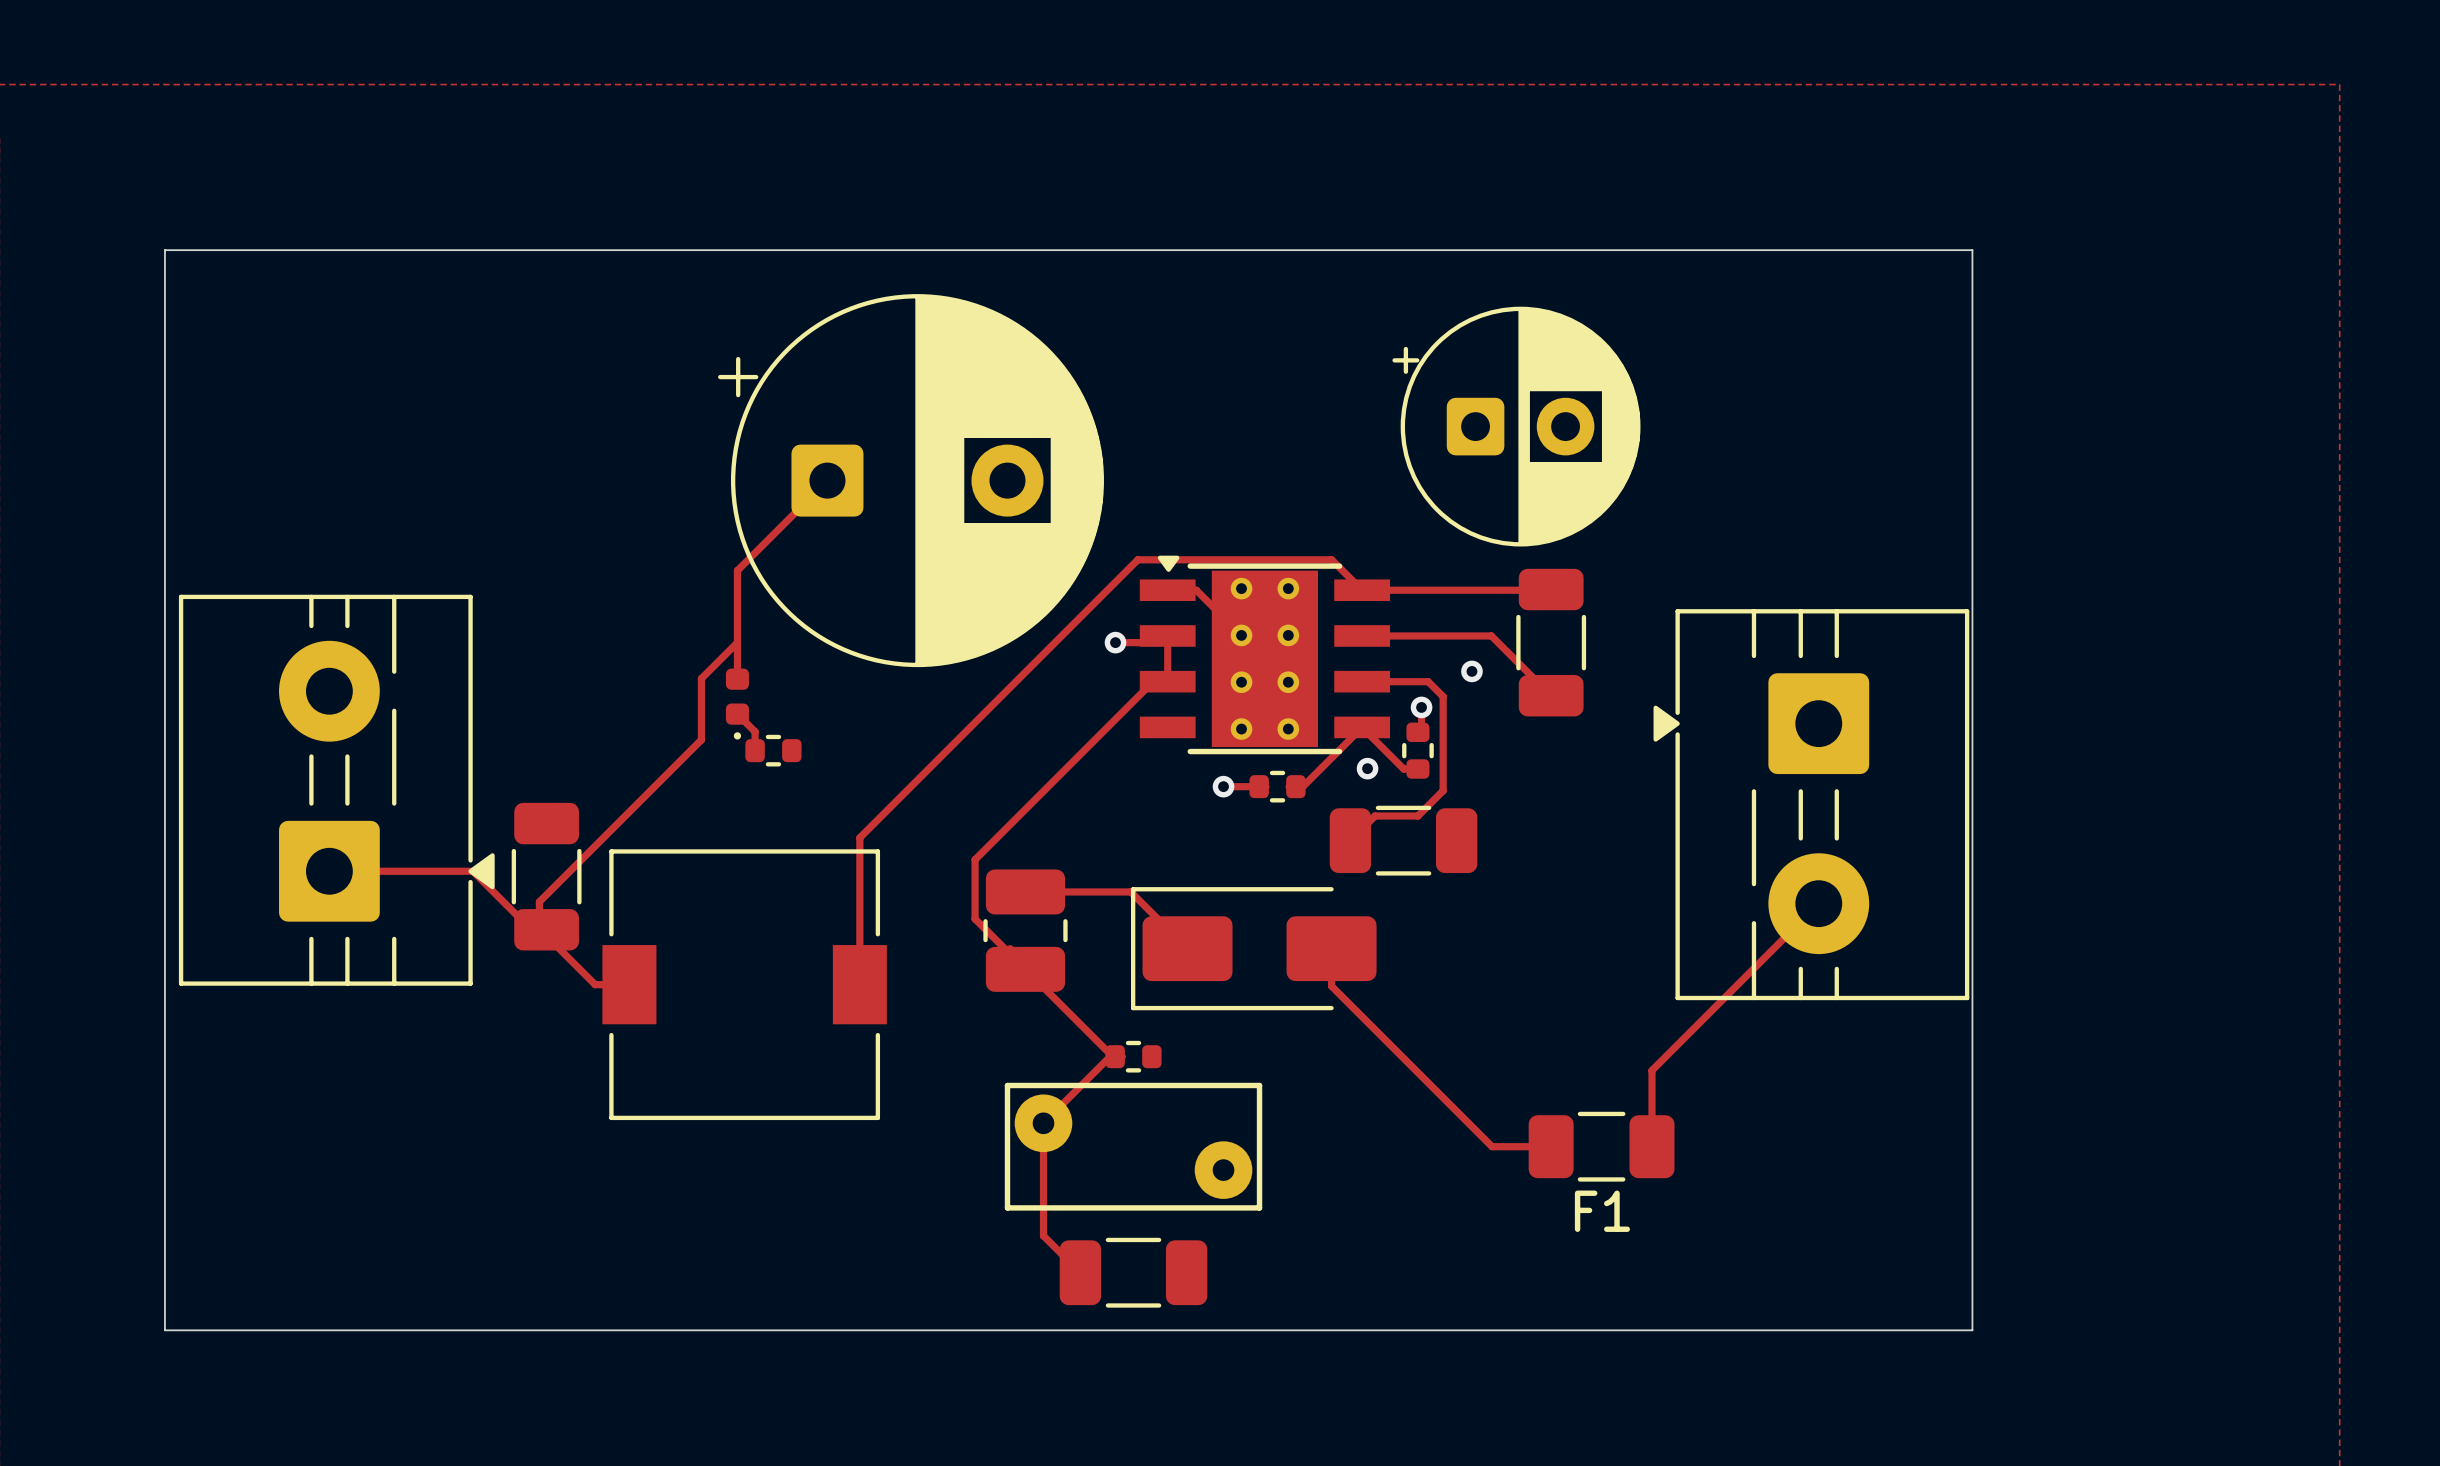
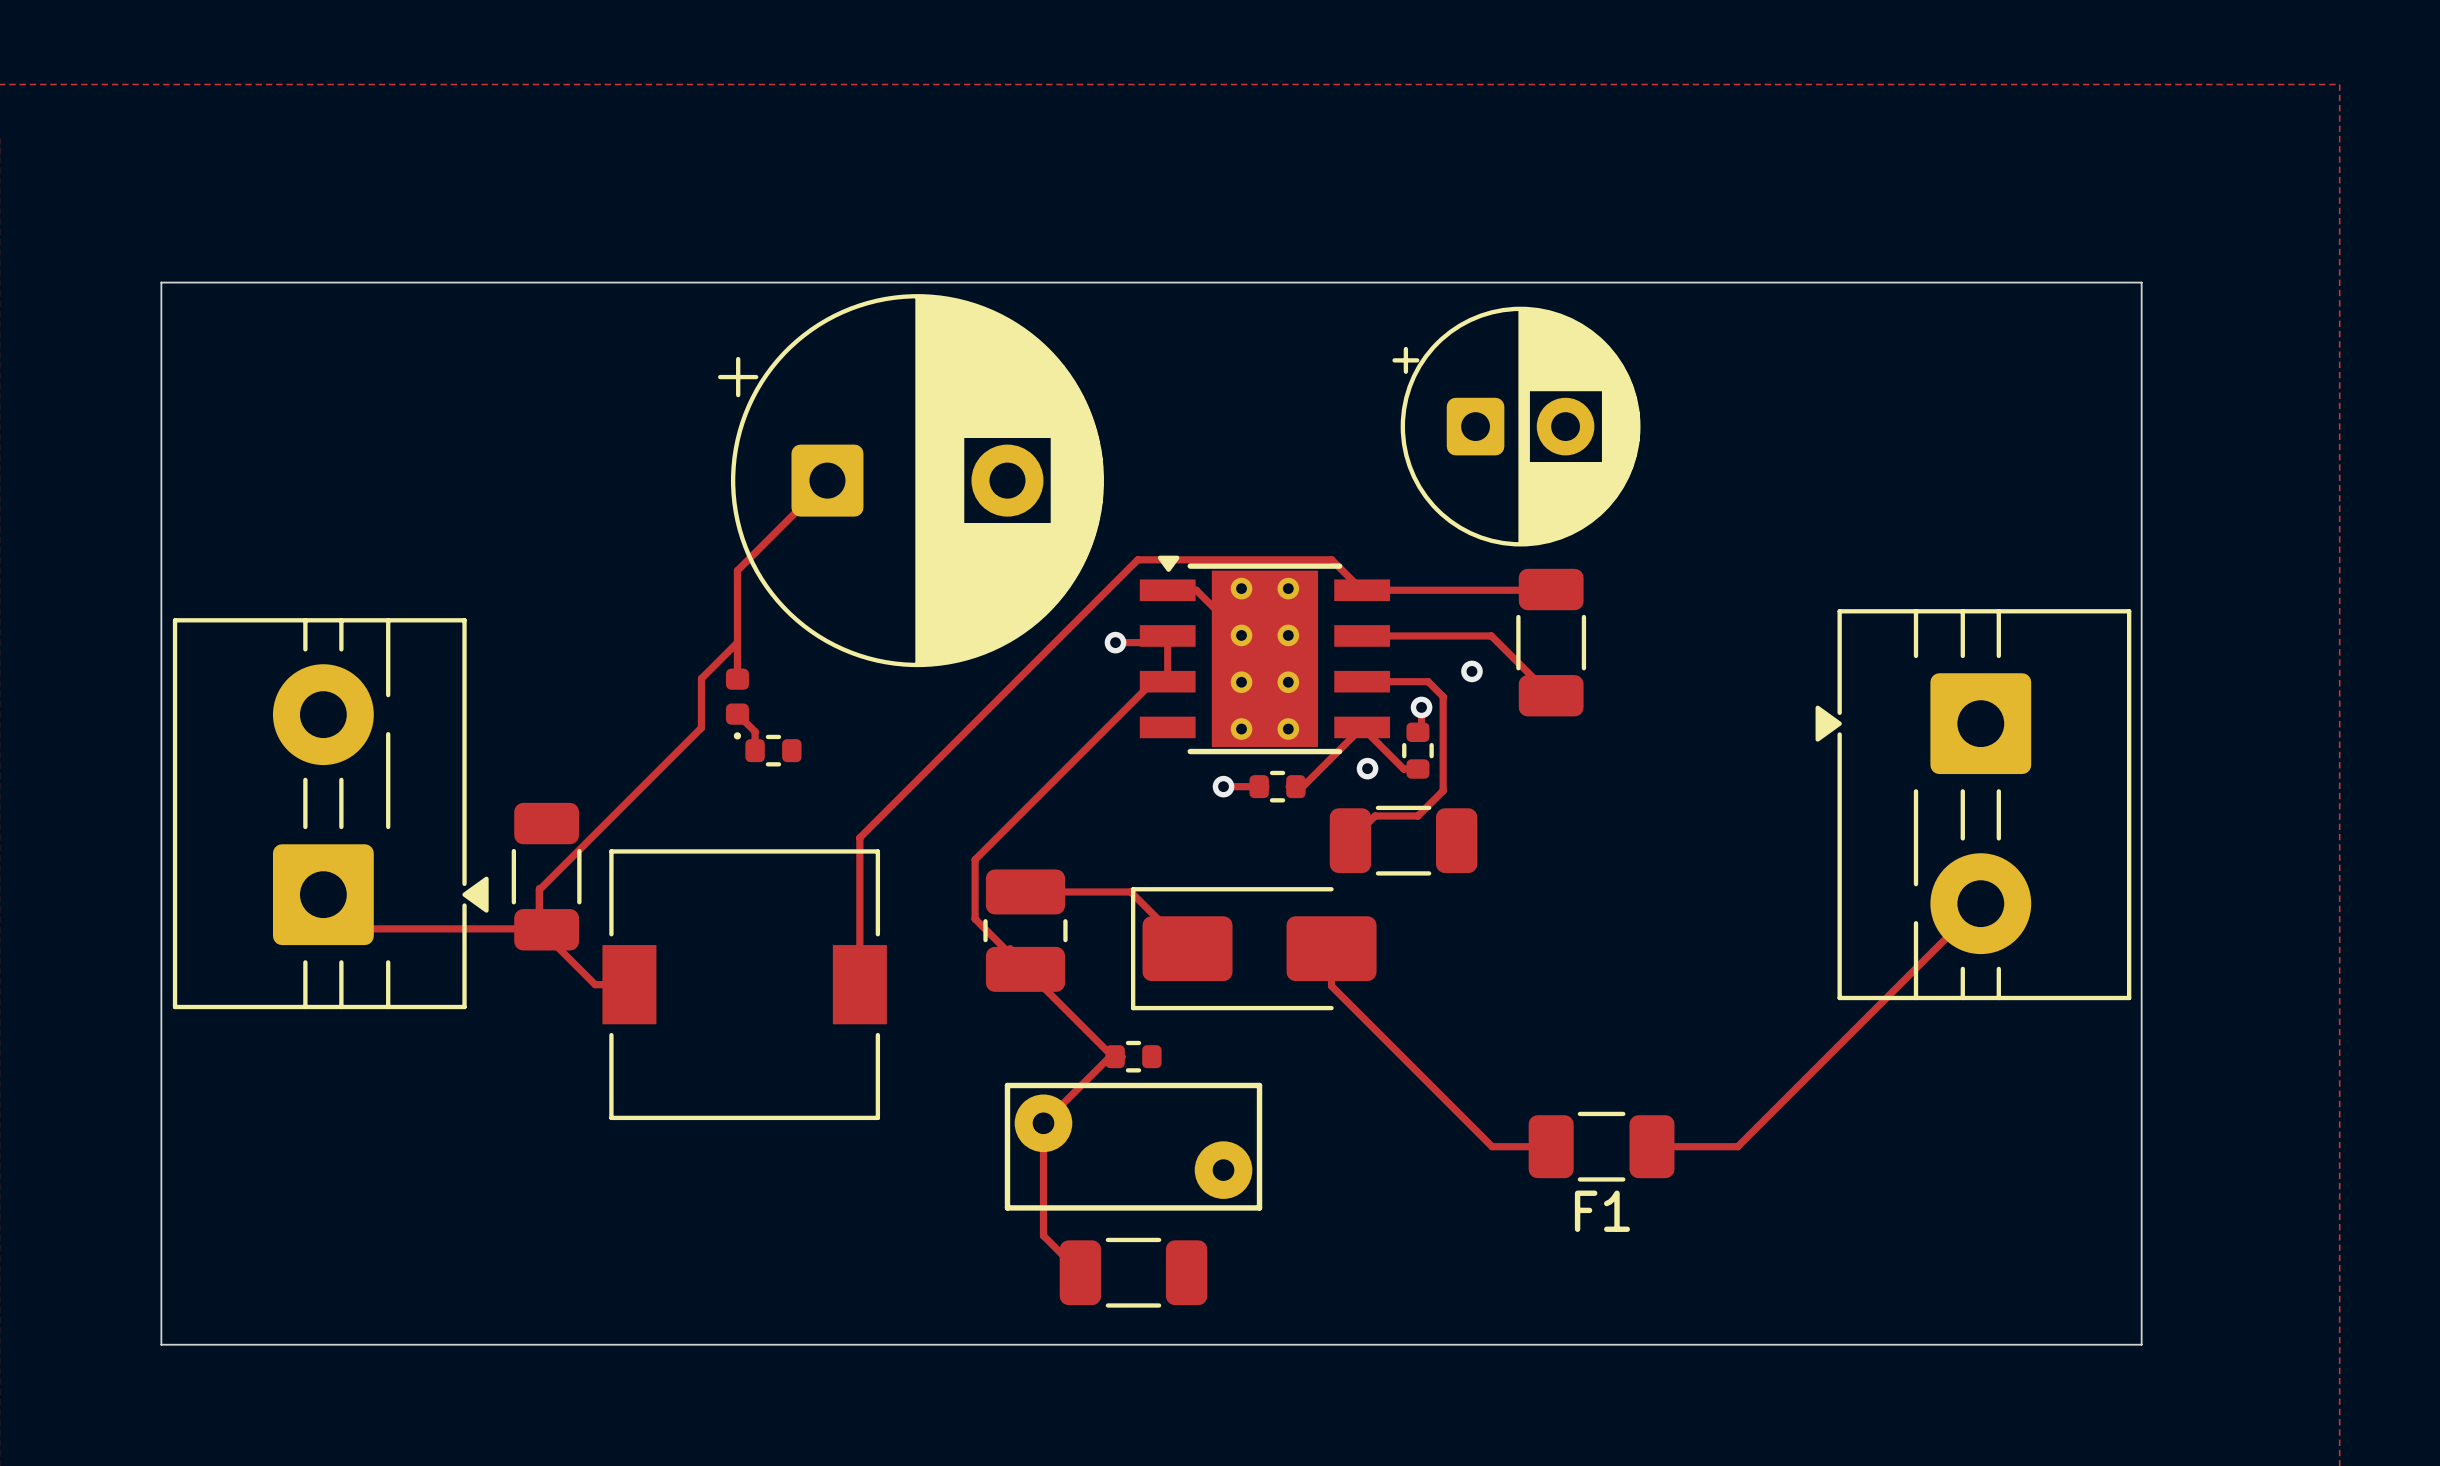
board edge: (164, 250) (1972, 250) (1972, 1330) (164, 1330) (164, 250) -> (161, 282) (161, 1344) (2141, 1344) (2141, 282) (161, 282)
track: (701, 727) (701, 739) (539, 901) -> (701, 727) (539, 889)
part position: (336, 790) -> (330, 813)
part position: (1811, 804) -> (1973, 804)
track: (329, 871) (472, 871) (530, 928) -> (323, 894) (357, 928) (530, 928)
track: none -> (539, 888) (539, 901)
track: (1818, 903) (1651, 1070) (1651, 1146) -> (1980, 903) (1737, 1146) (1651, 1146)

